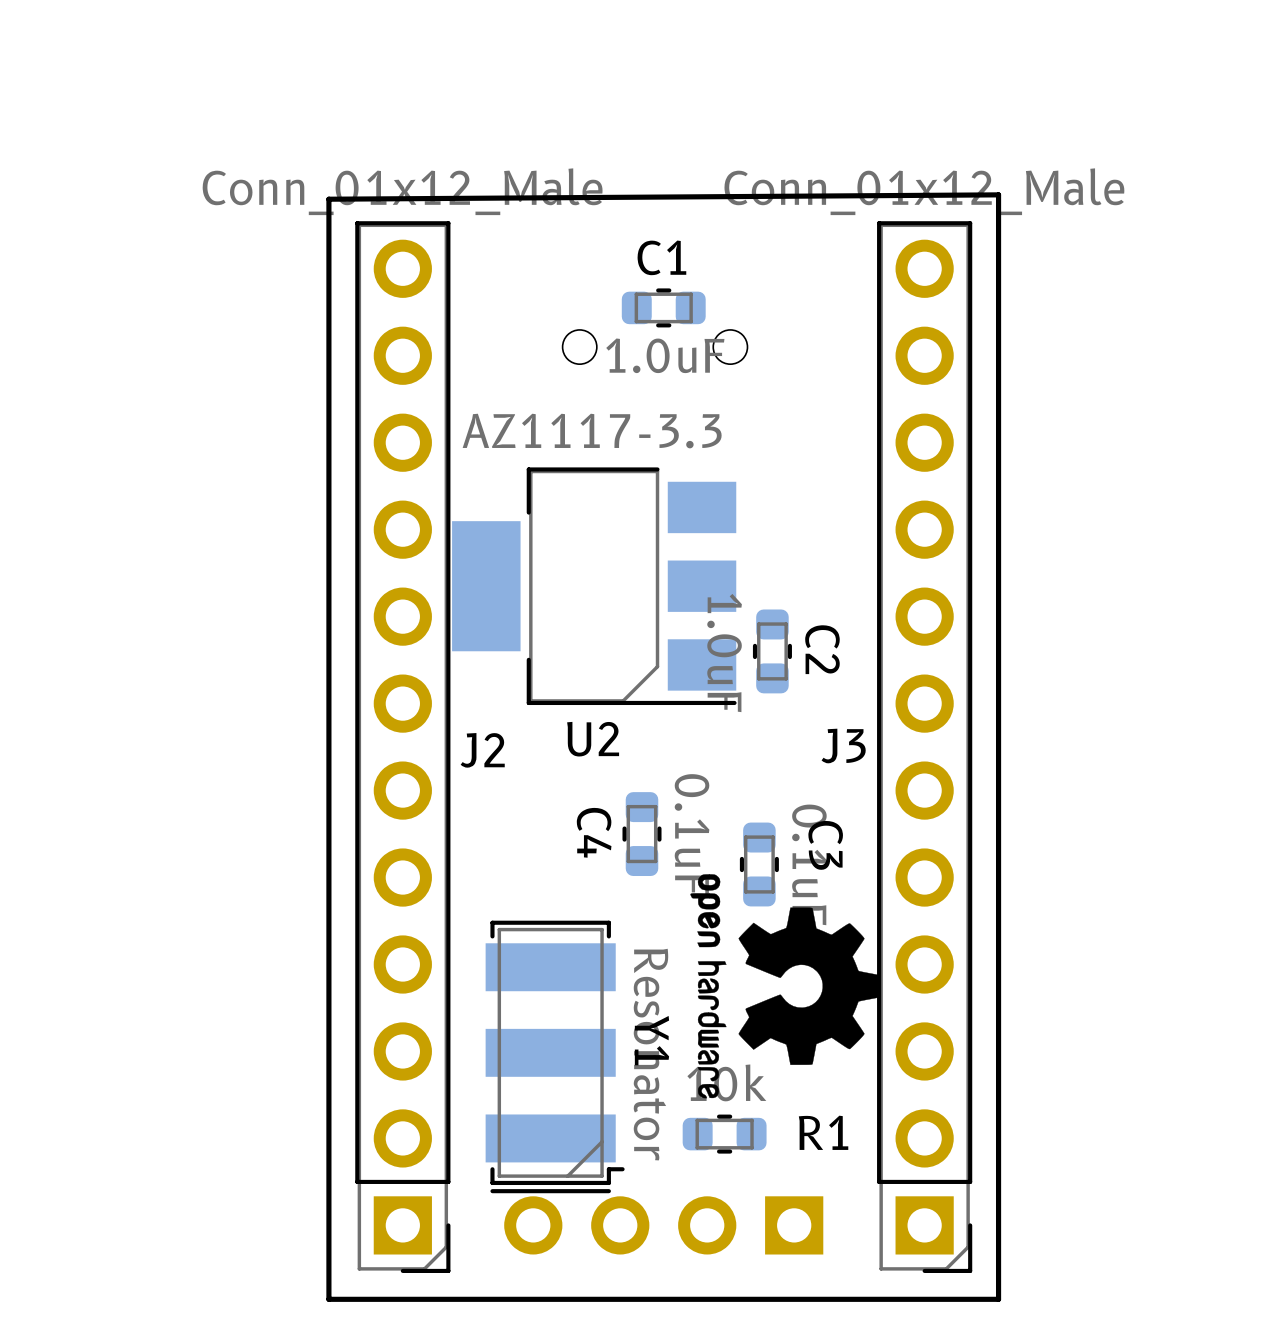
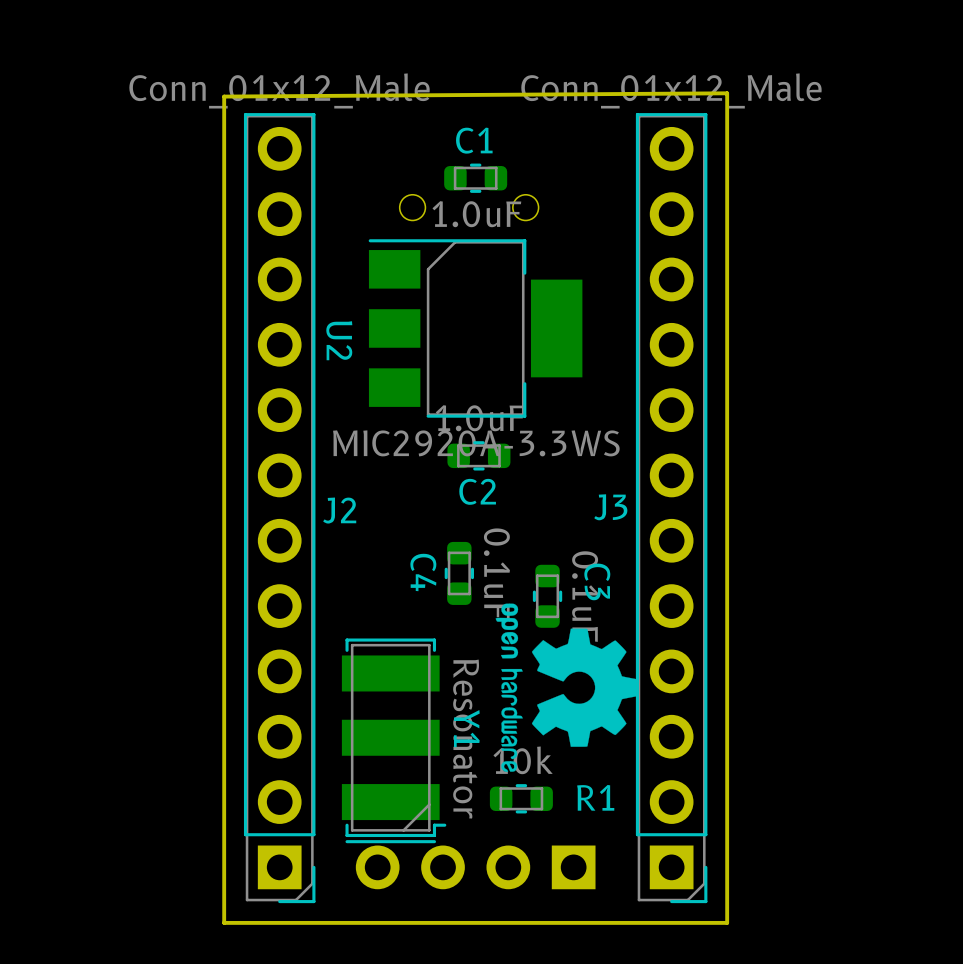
U2 value: AZ1117-3.3 (592, 431) -> MIC2920A-3.3WS (476, 443)
U2 footprint: [452, 467, 737, 706] -> [368, 239, 583, 418]
C2 rotation: 0° (772, 651) -> 90° clockwise (478, 455)
C2 position: (772, 651) -> (478, 455)
U2 name position: U2 (593, 739) -> U2 (339, 340)

